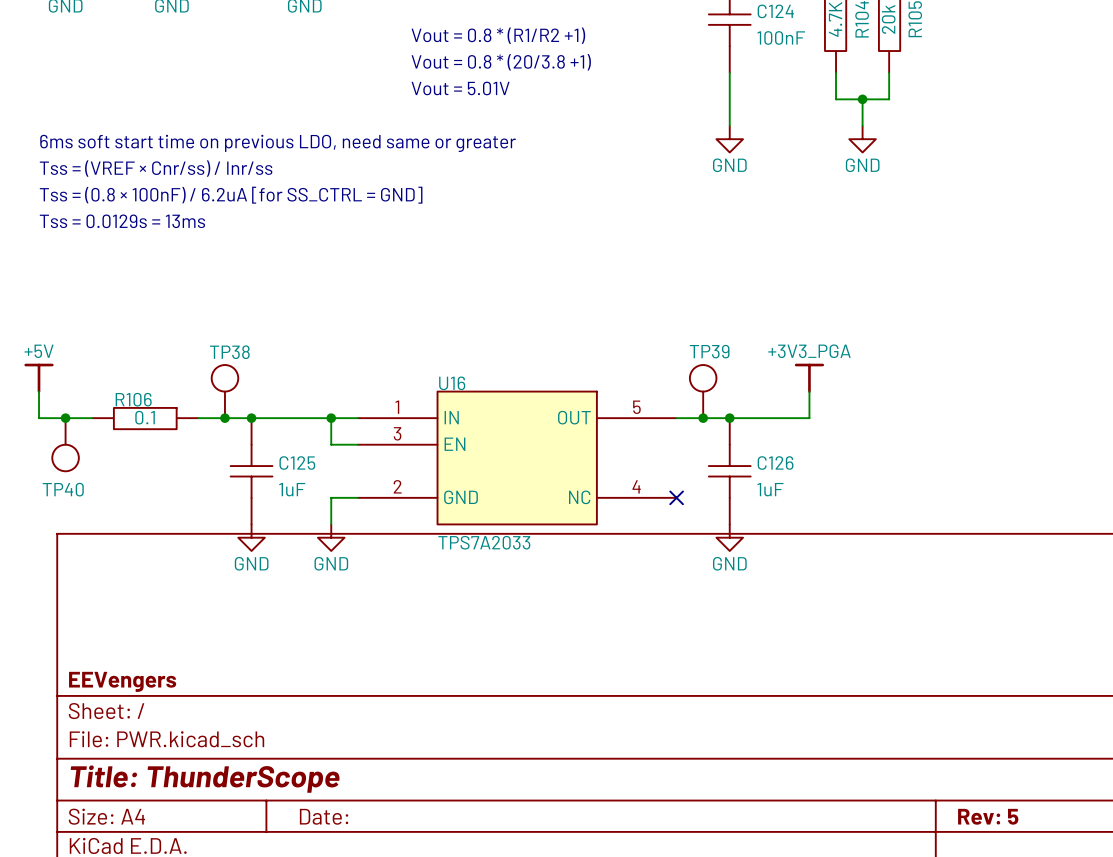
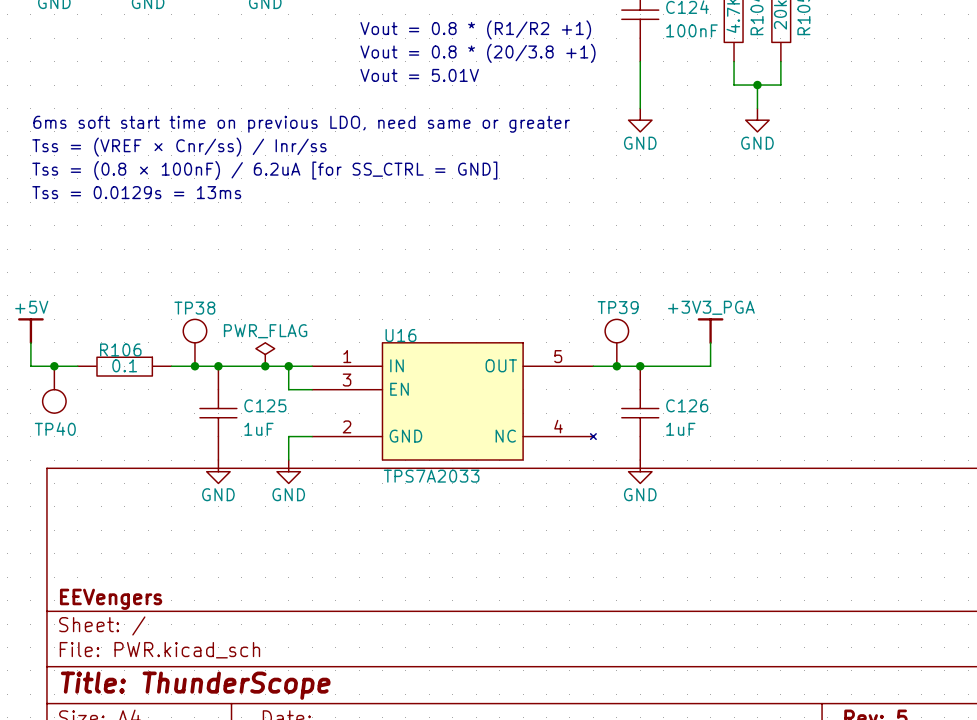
U16 symbol: [357, 391, 677, 525] -> [312, 342, 597, 461]
power symbol: none -> PWR_FLAG (265, 354)
junction: none -> (265, 366)
no-connect mark: (676, 497) -> none

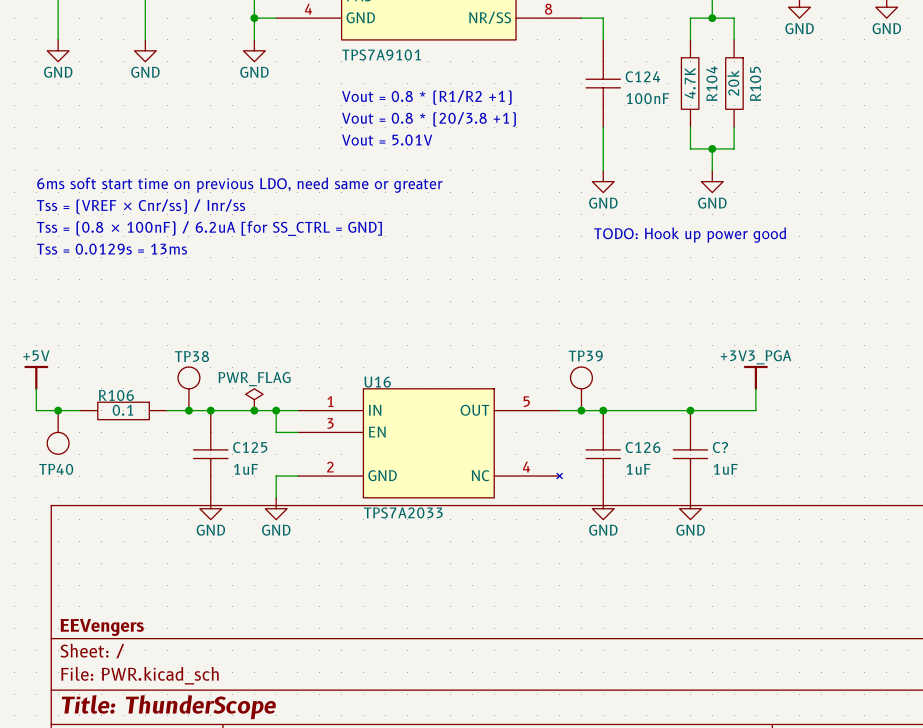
text: none -> TODO: Hook up power good (690, 235)
power symbol position: +3V3_PGA (710, 331) -> +3V3_PGA (755, 377)
wire: (710, 342) (710, 366) -> (755, 388) (755, 410) (668, 410)
junction: none -> (690, 410)
C?: none -> 1uF (690, 454)
power symbol: none -> GND (690, 508)

